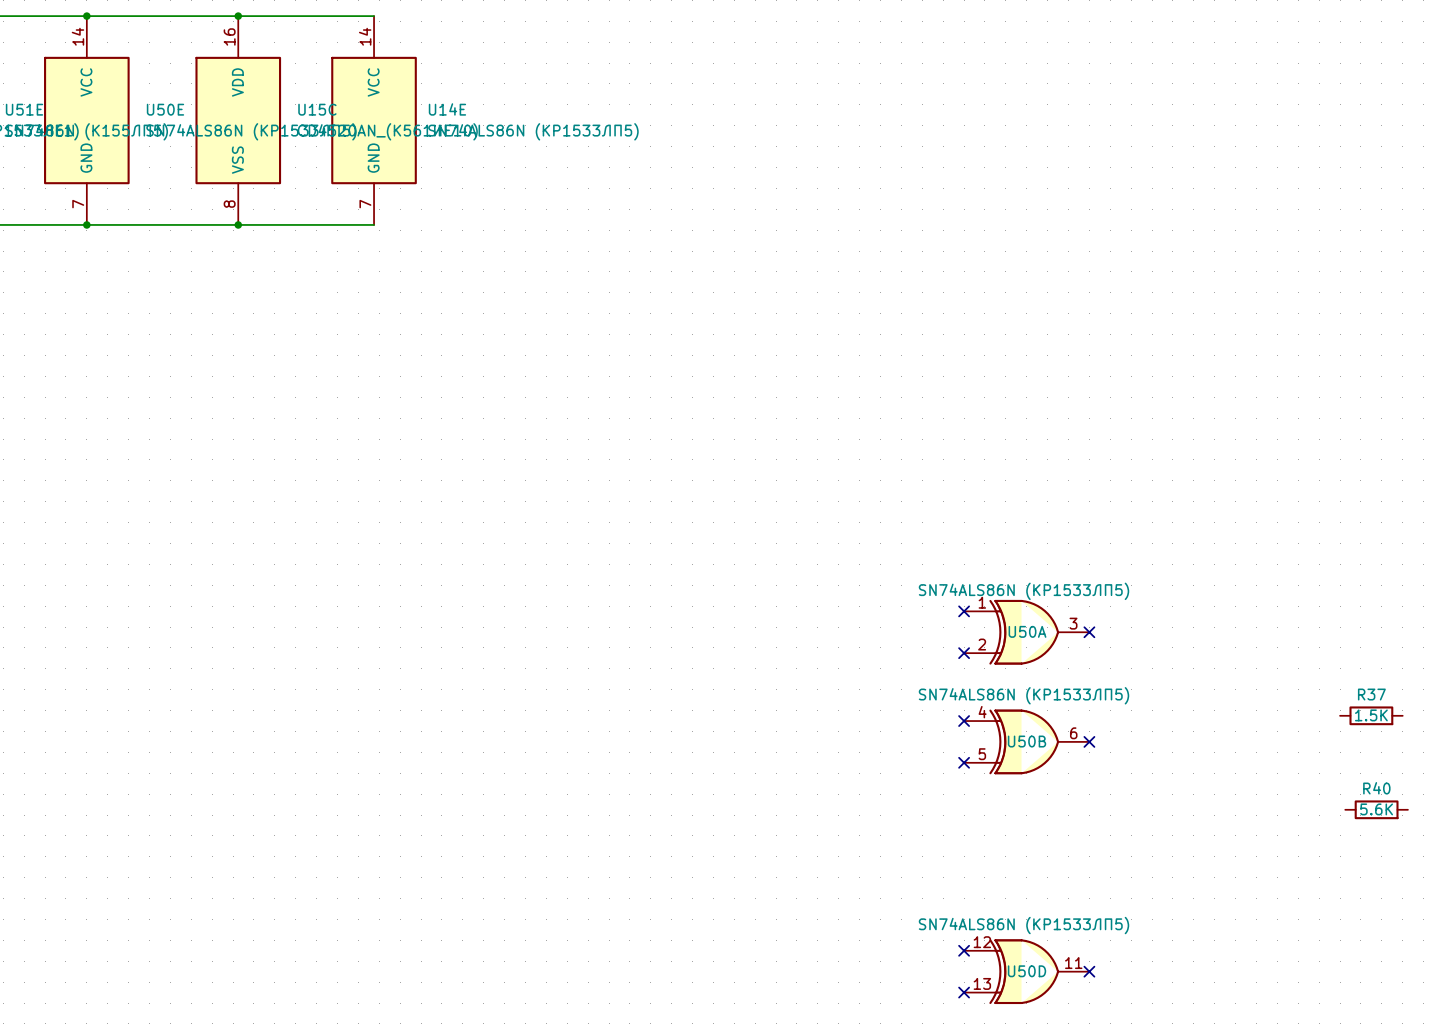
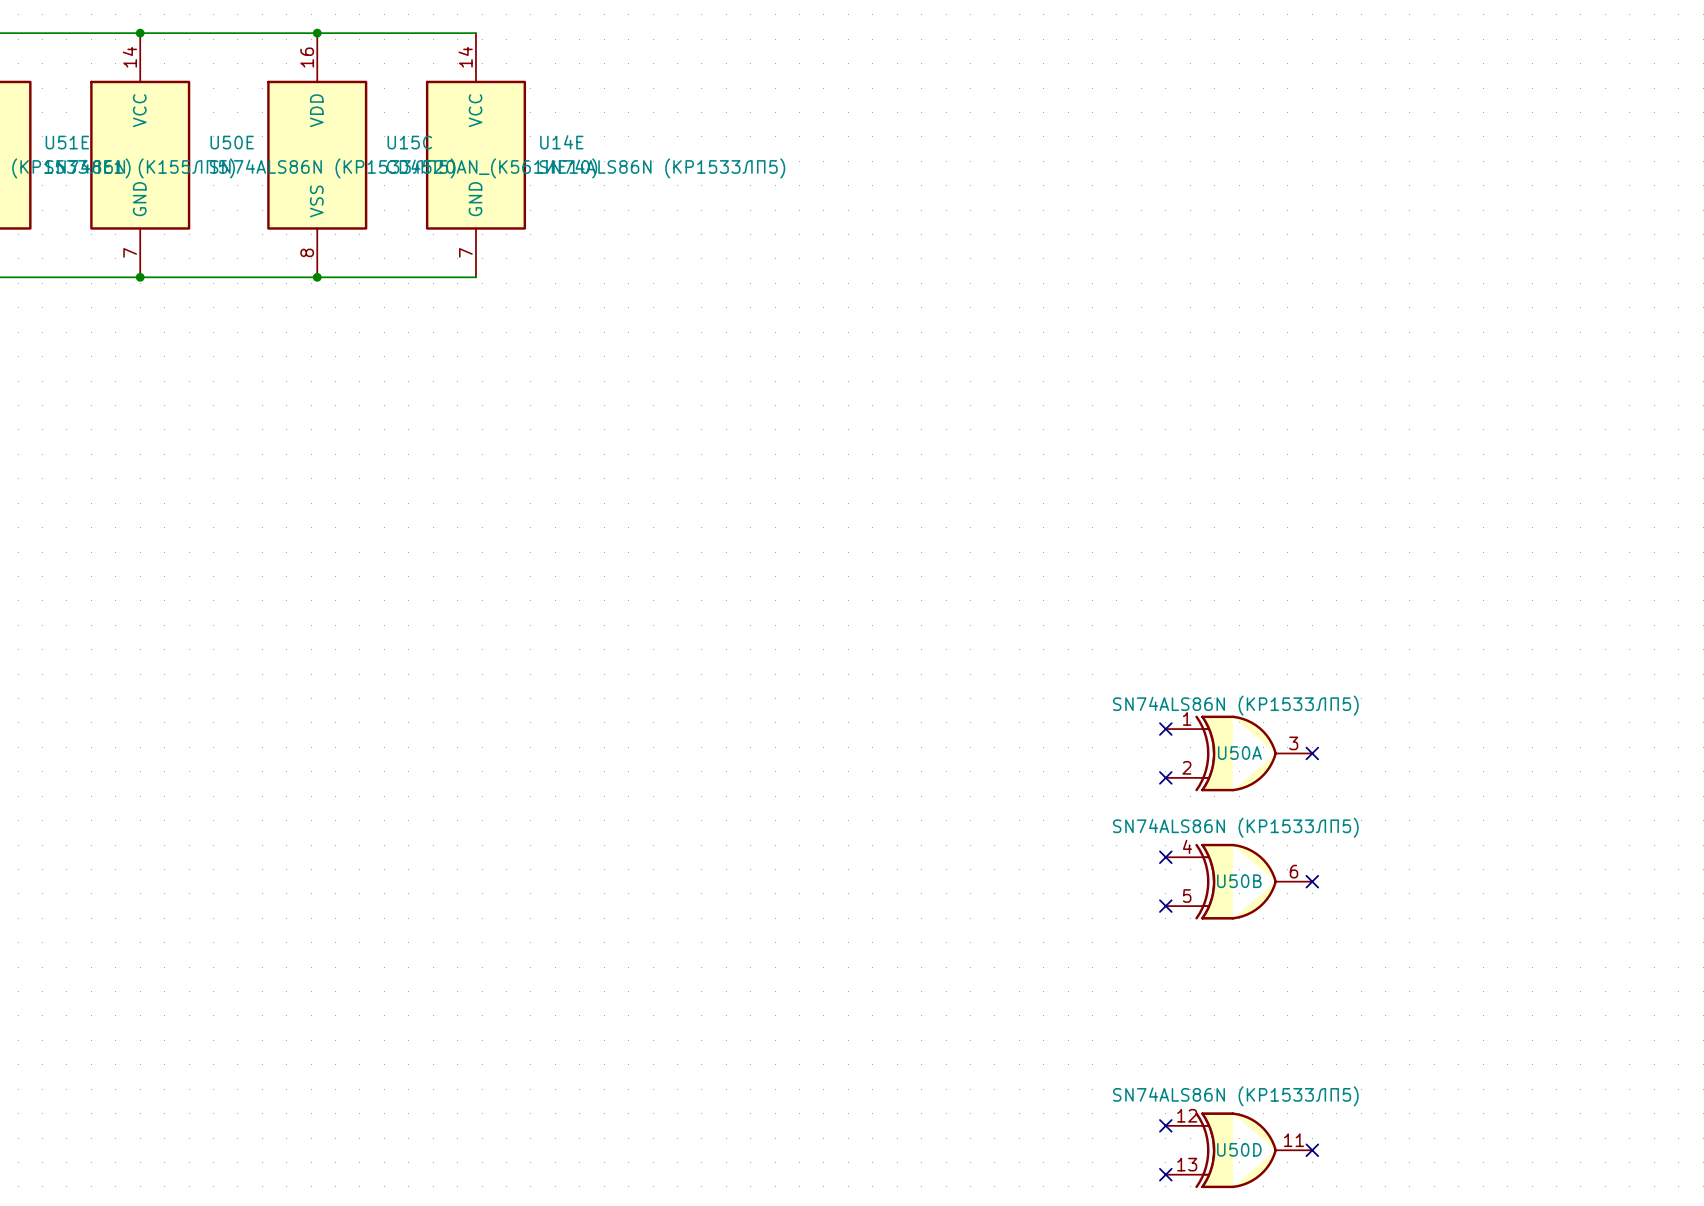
R37: 1.5K (1371, 715) -> none
R40: 5.6K (1376, 809) -> none

